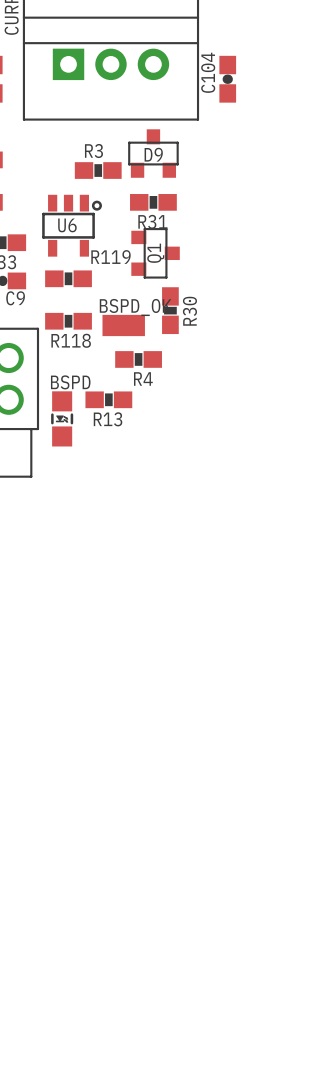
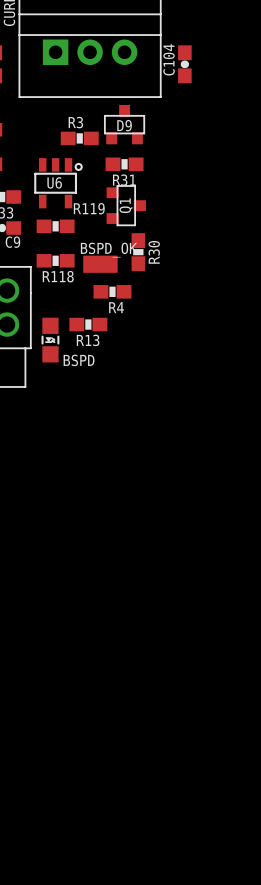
BSPD name position: BSPD (70, 382) -> BSPD (79, 360)

